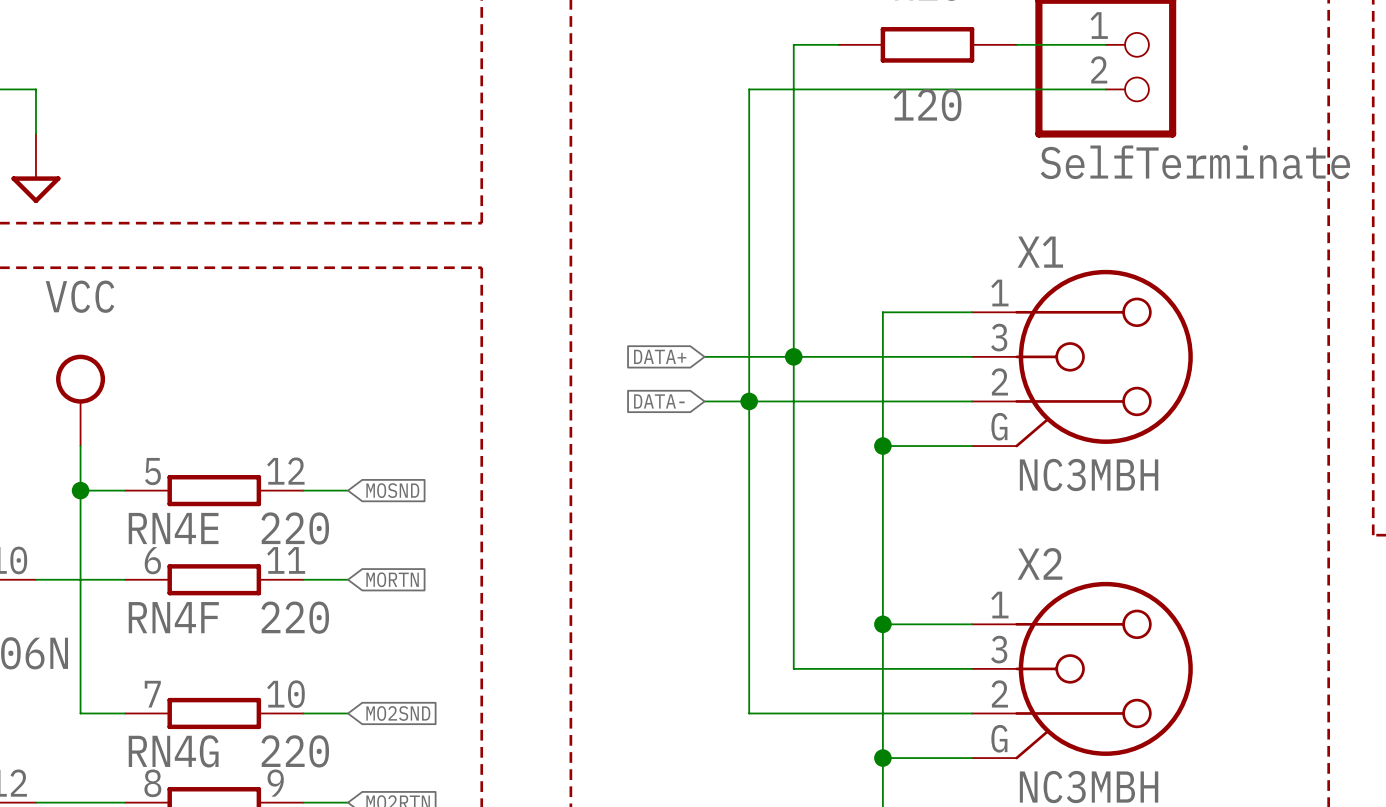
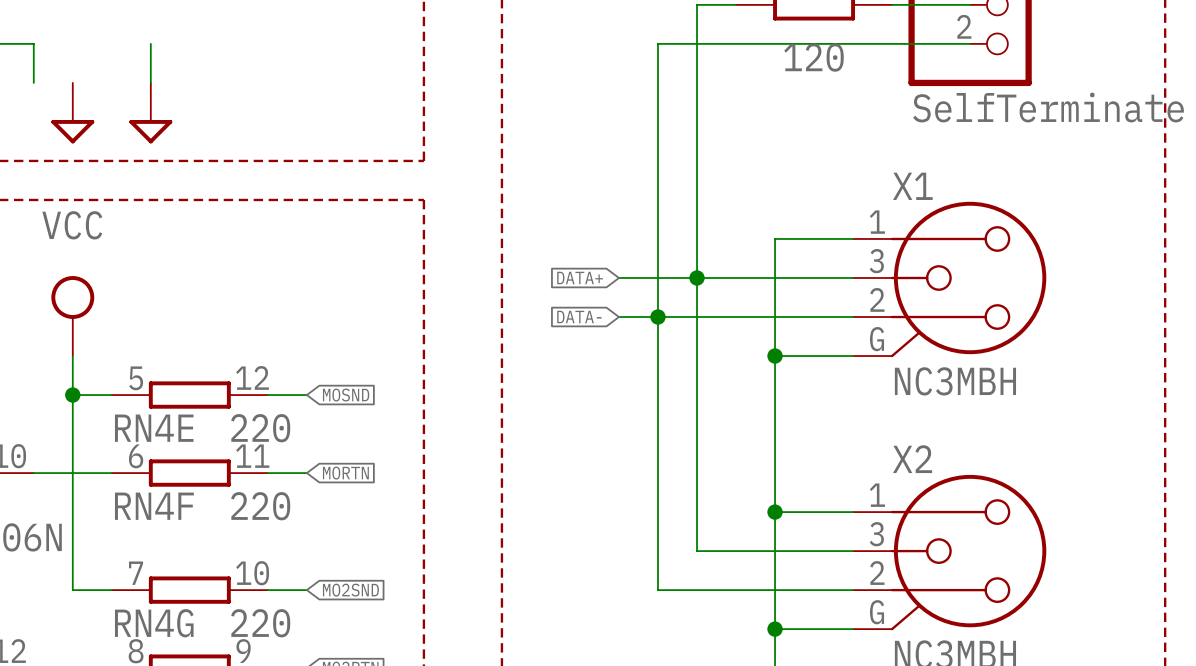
wire: none -> (150, 43) (150, 82)
power symbol position: (35, 168) -> (72, 113)
power symbol: none -> (150, 113)

